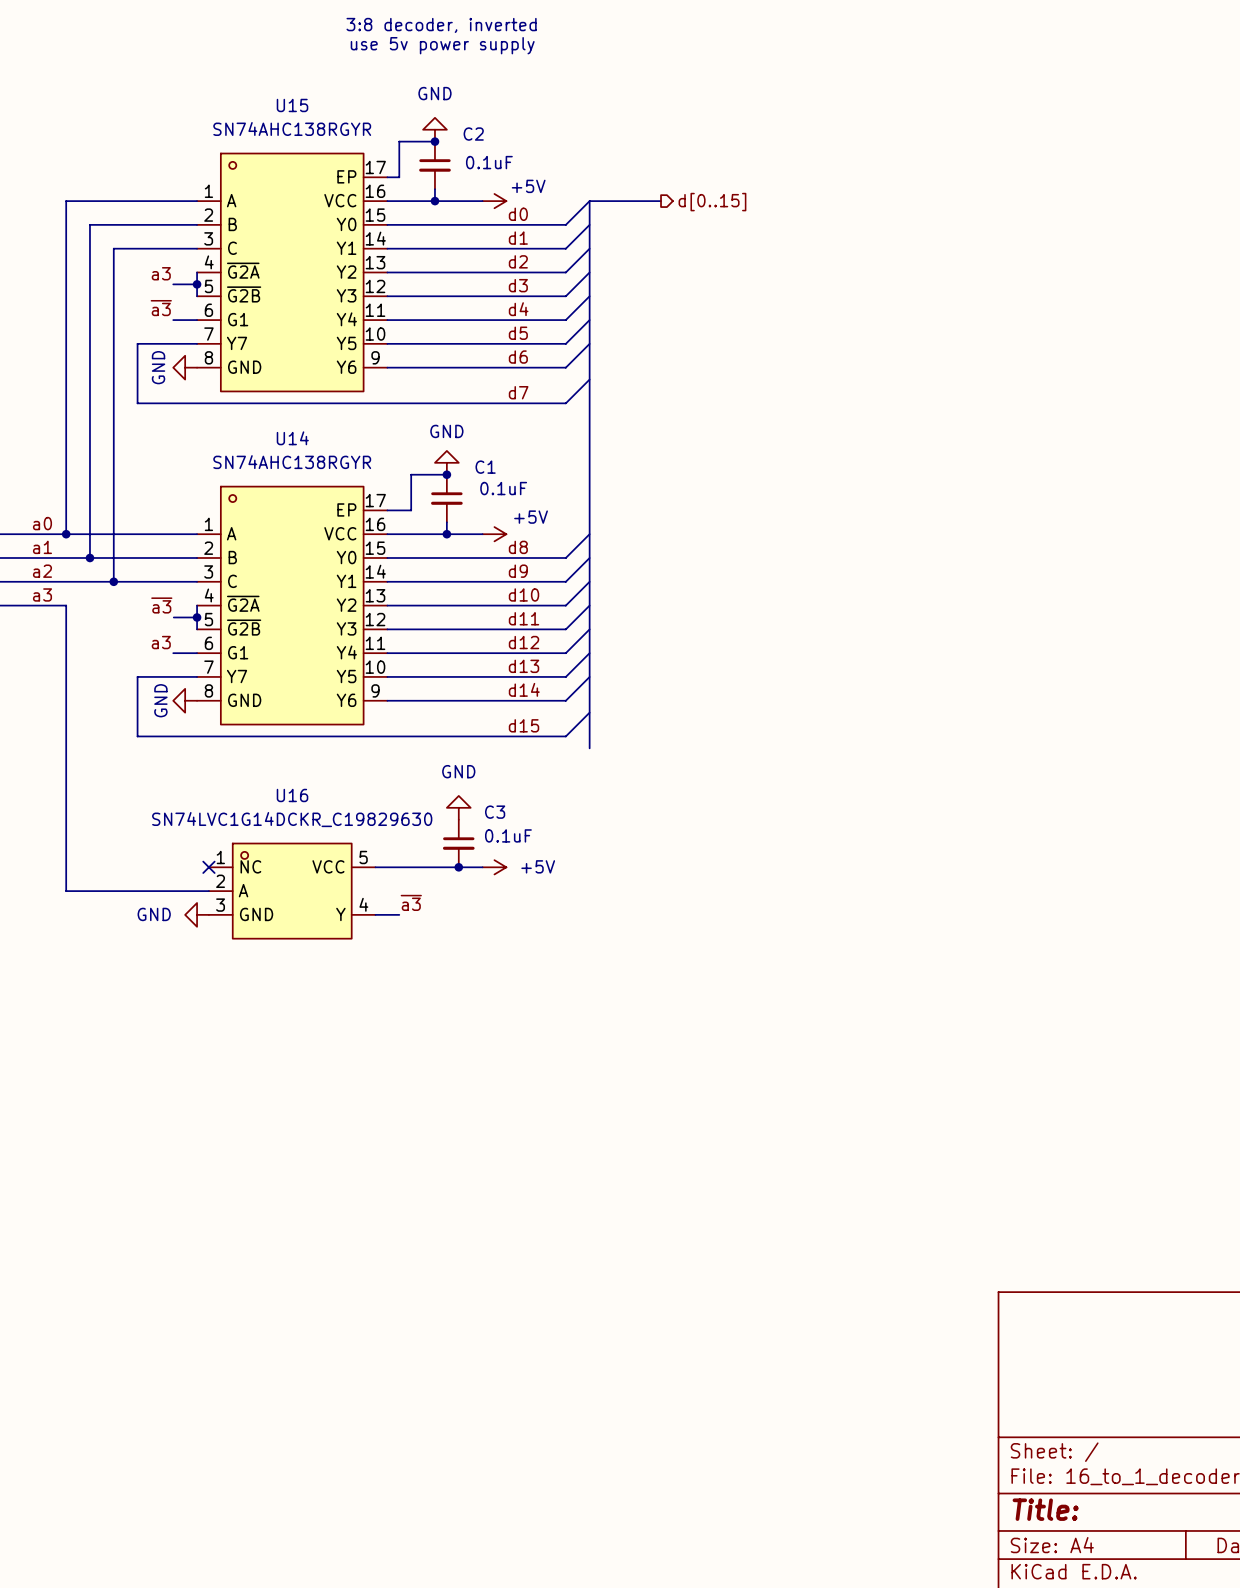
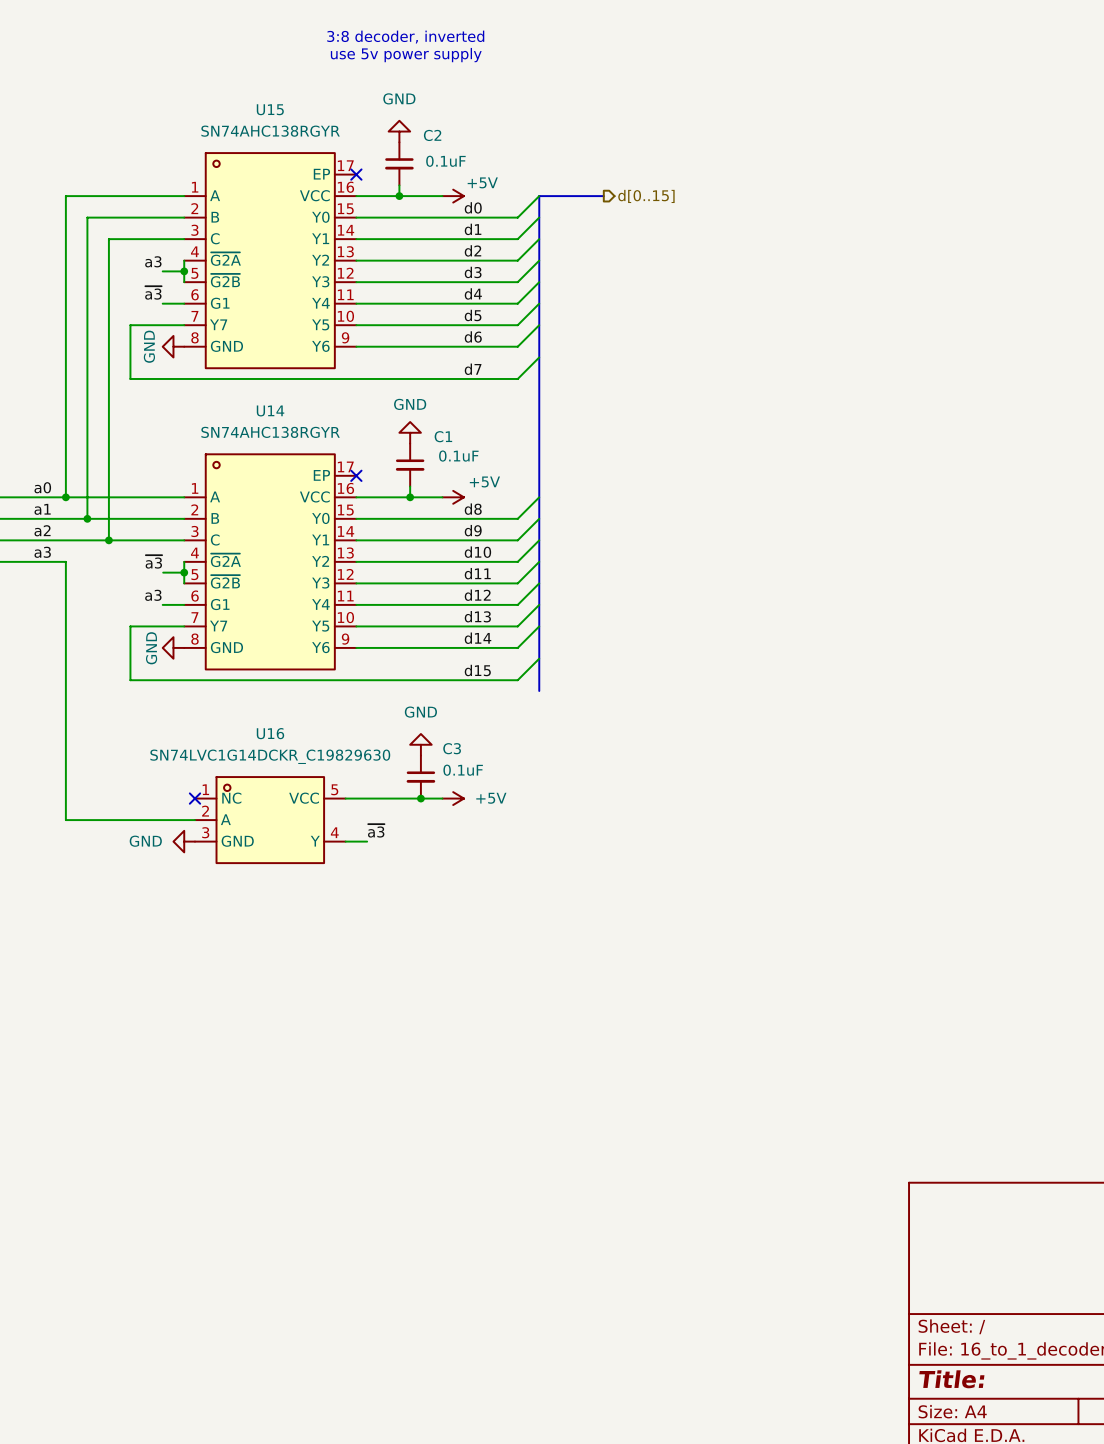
wire: (434, 141) (399, 141) (399, 177) (387, 177) -> none
junction: (434, 141) -> none
no-connect mark: none -> (356, 174)
wire: (446, 474) (411, 474) (411, 510) (387, 510) -> none
junction: (446, 474) -> none
no-connect mark: none -> (356, 475)

